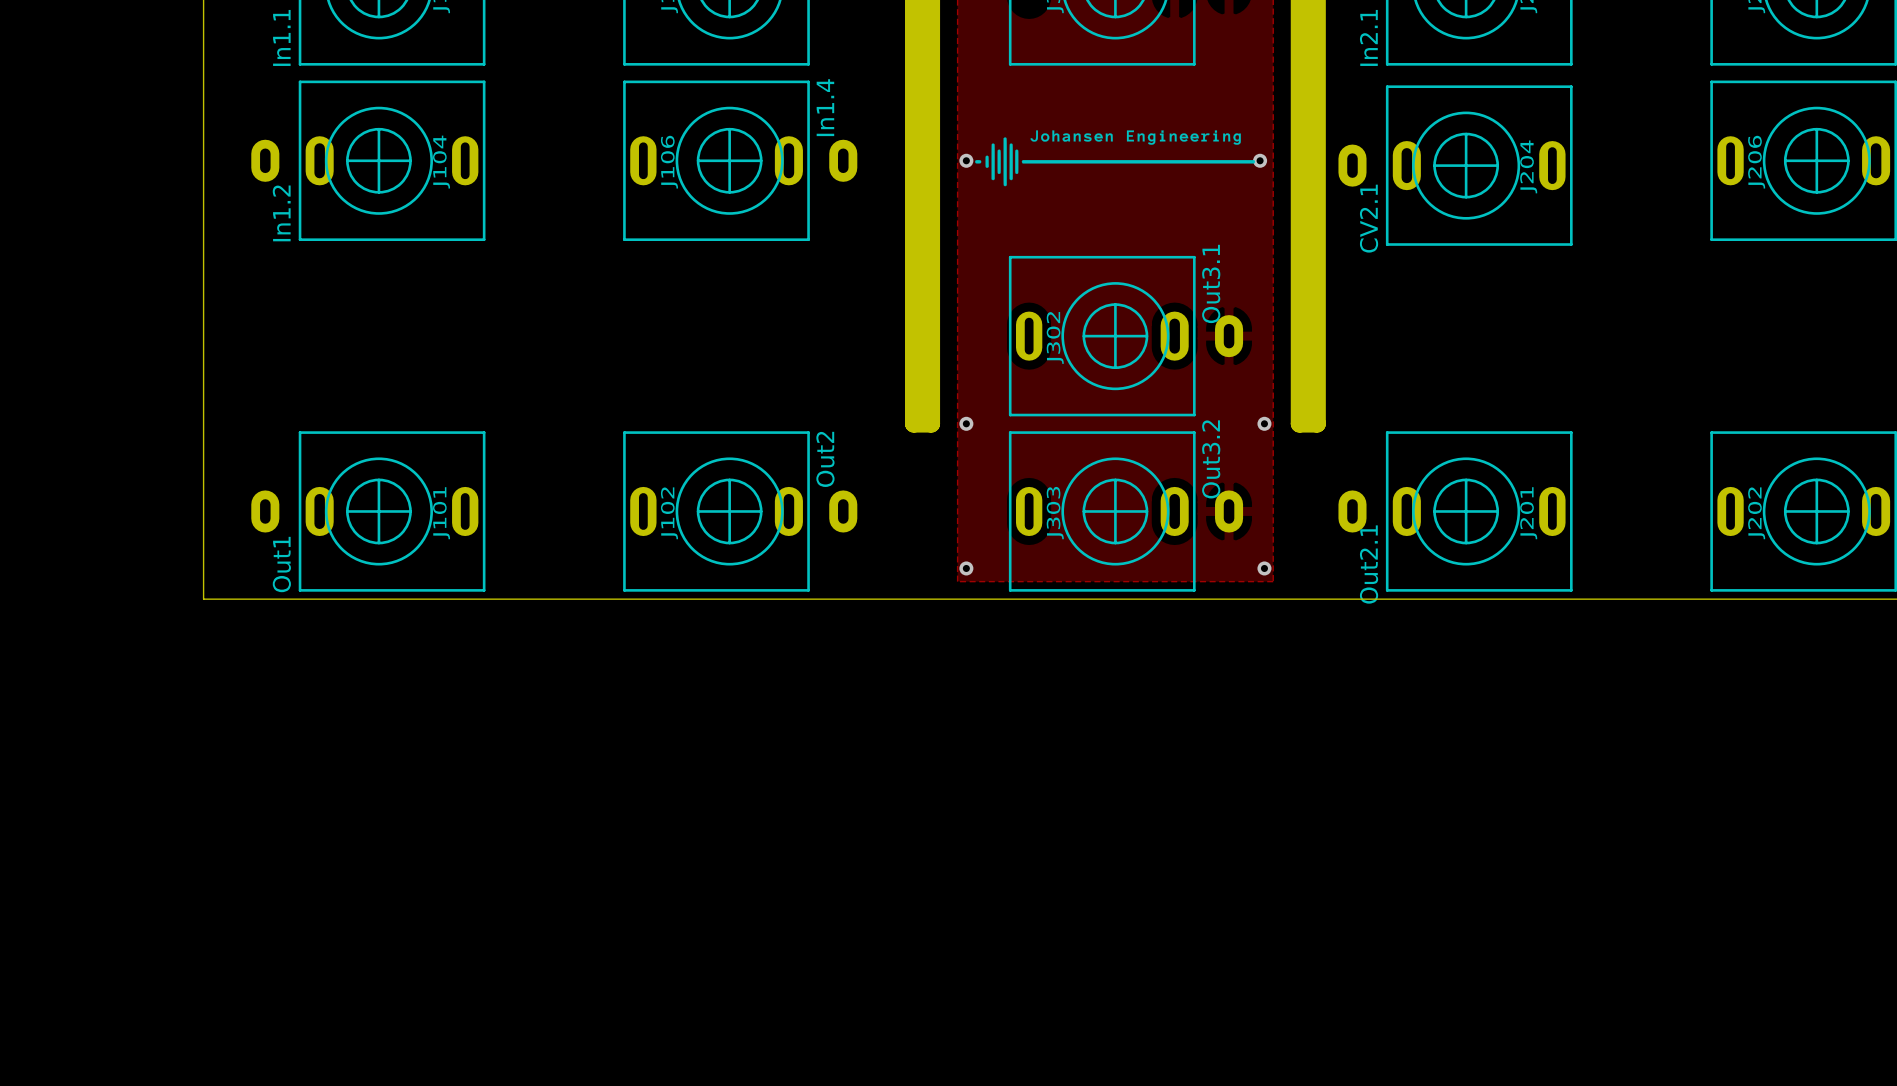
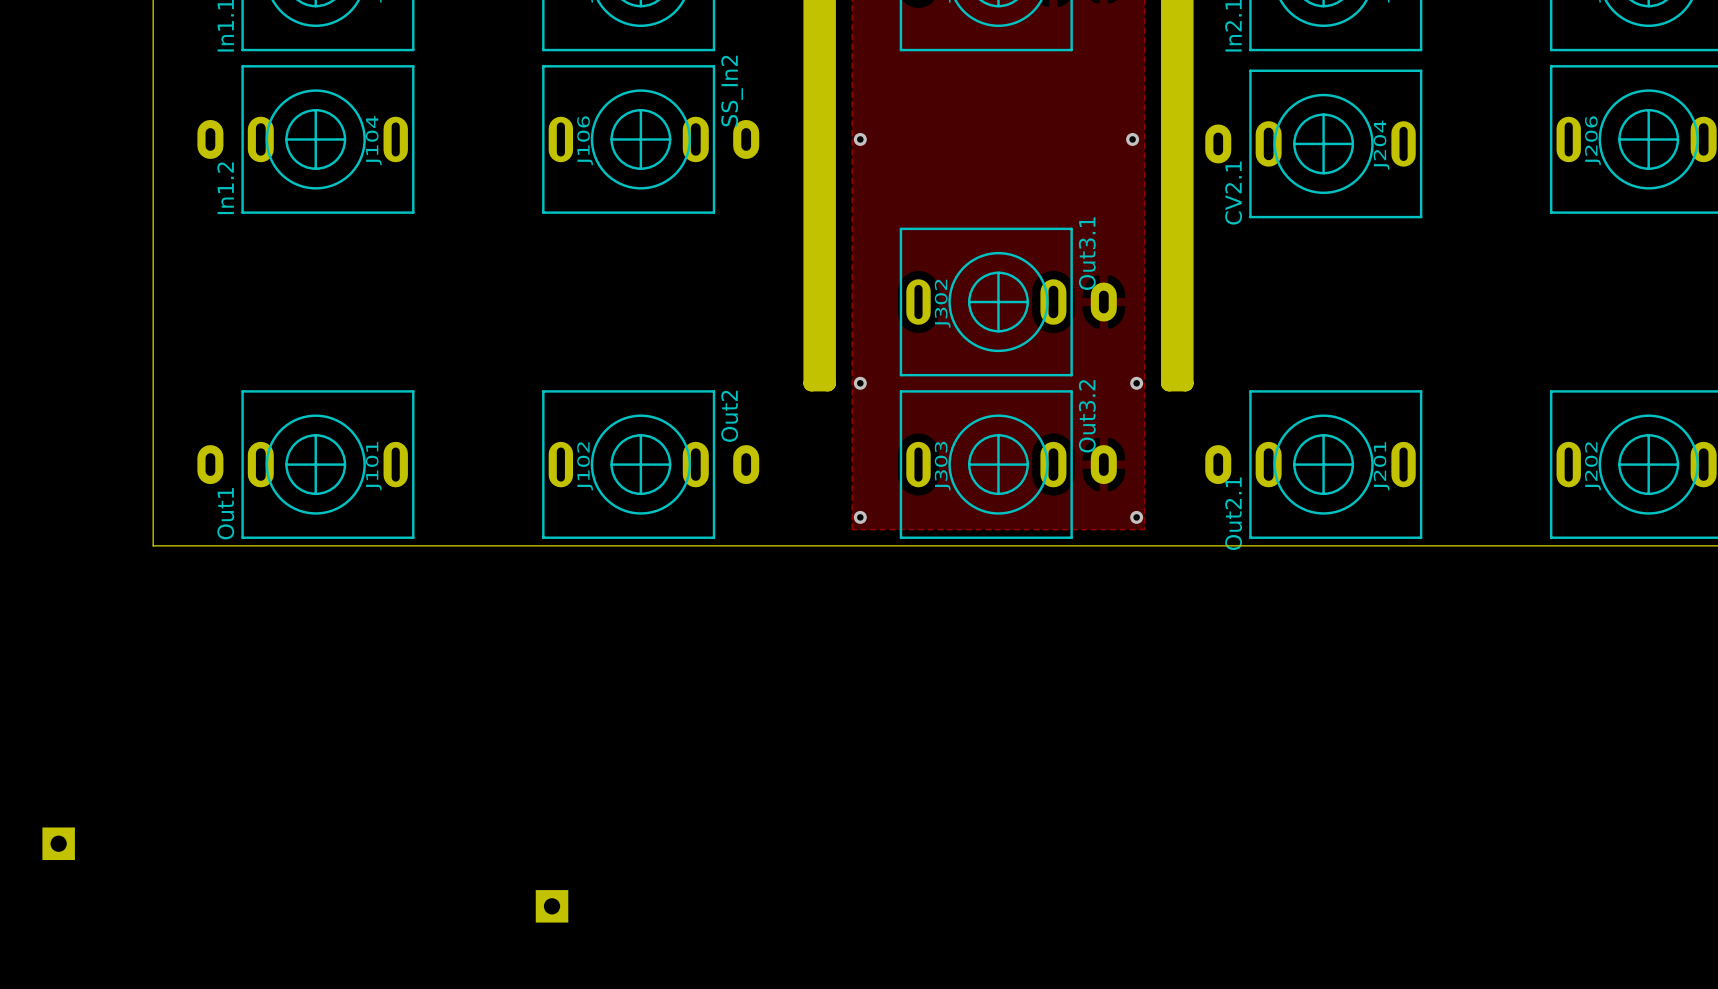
J106 value: In1.4 (825, 107) -> SS_In2 (732, 91)
drawing: [975, 130, 1256, 187] -> none
part: none -> (58, 843)
part: none -> (552, 906)

